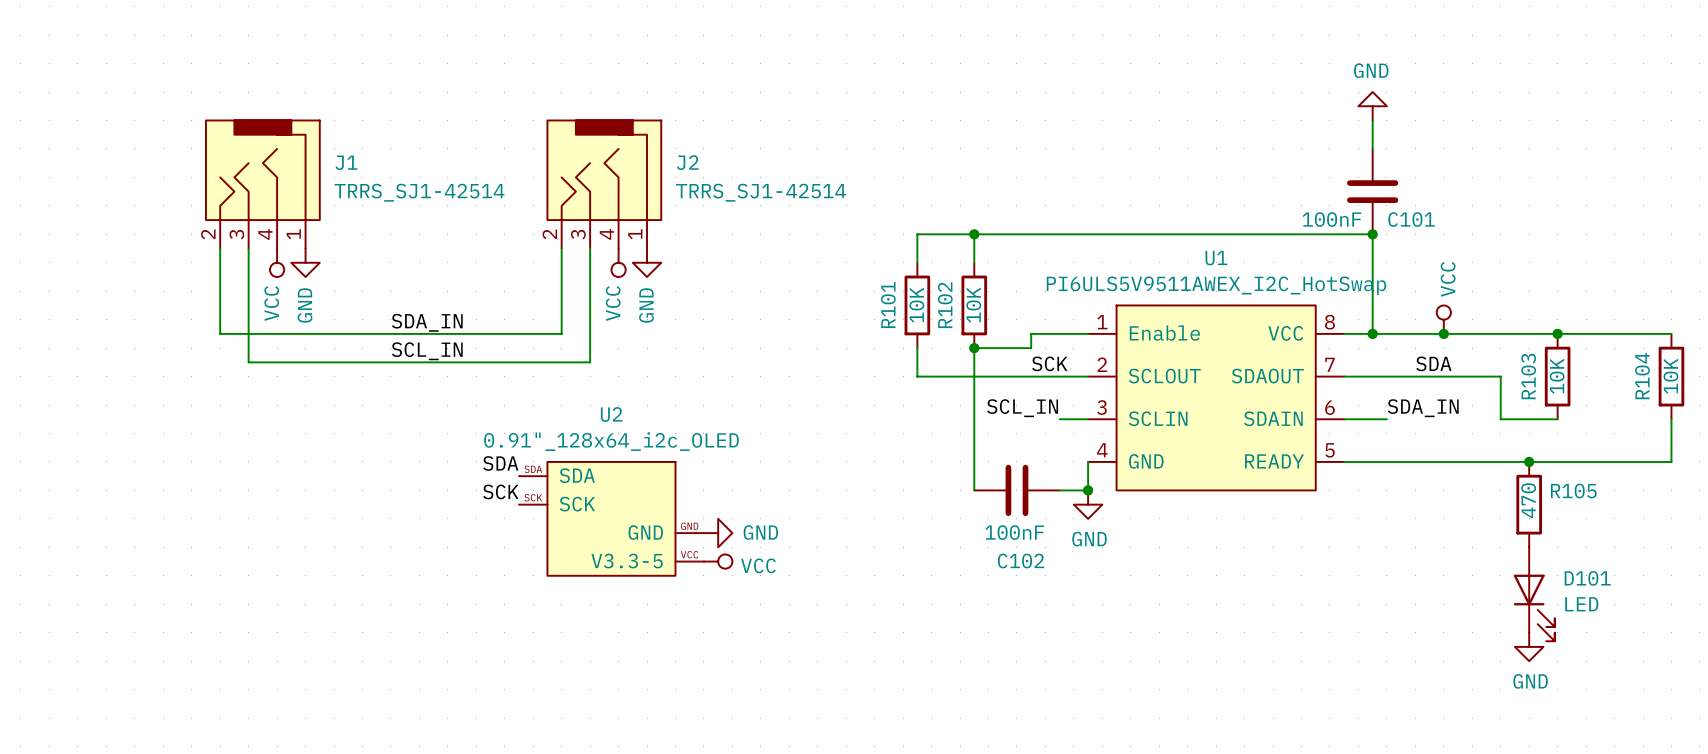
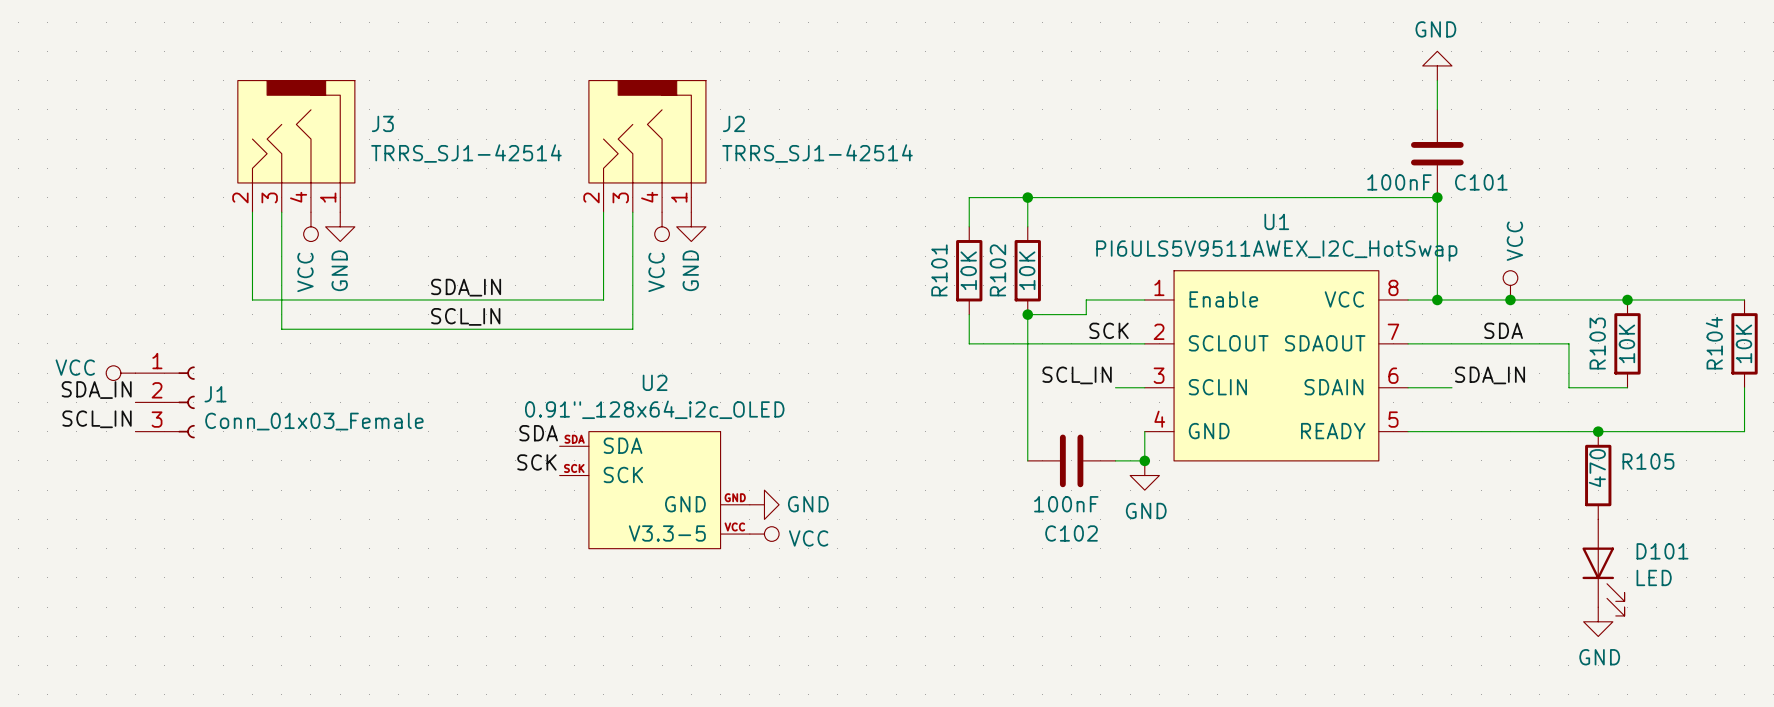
J1 name: J1 (346, 162) -> J3 (382, 123)
power symbol: none -> VCC (120, 373)
label: none -> SDA_IN (96, 390)
J1: none -> Conn_01x03_Female (165, 402)
label: none -> SCL_IN (97, 419)

